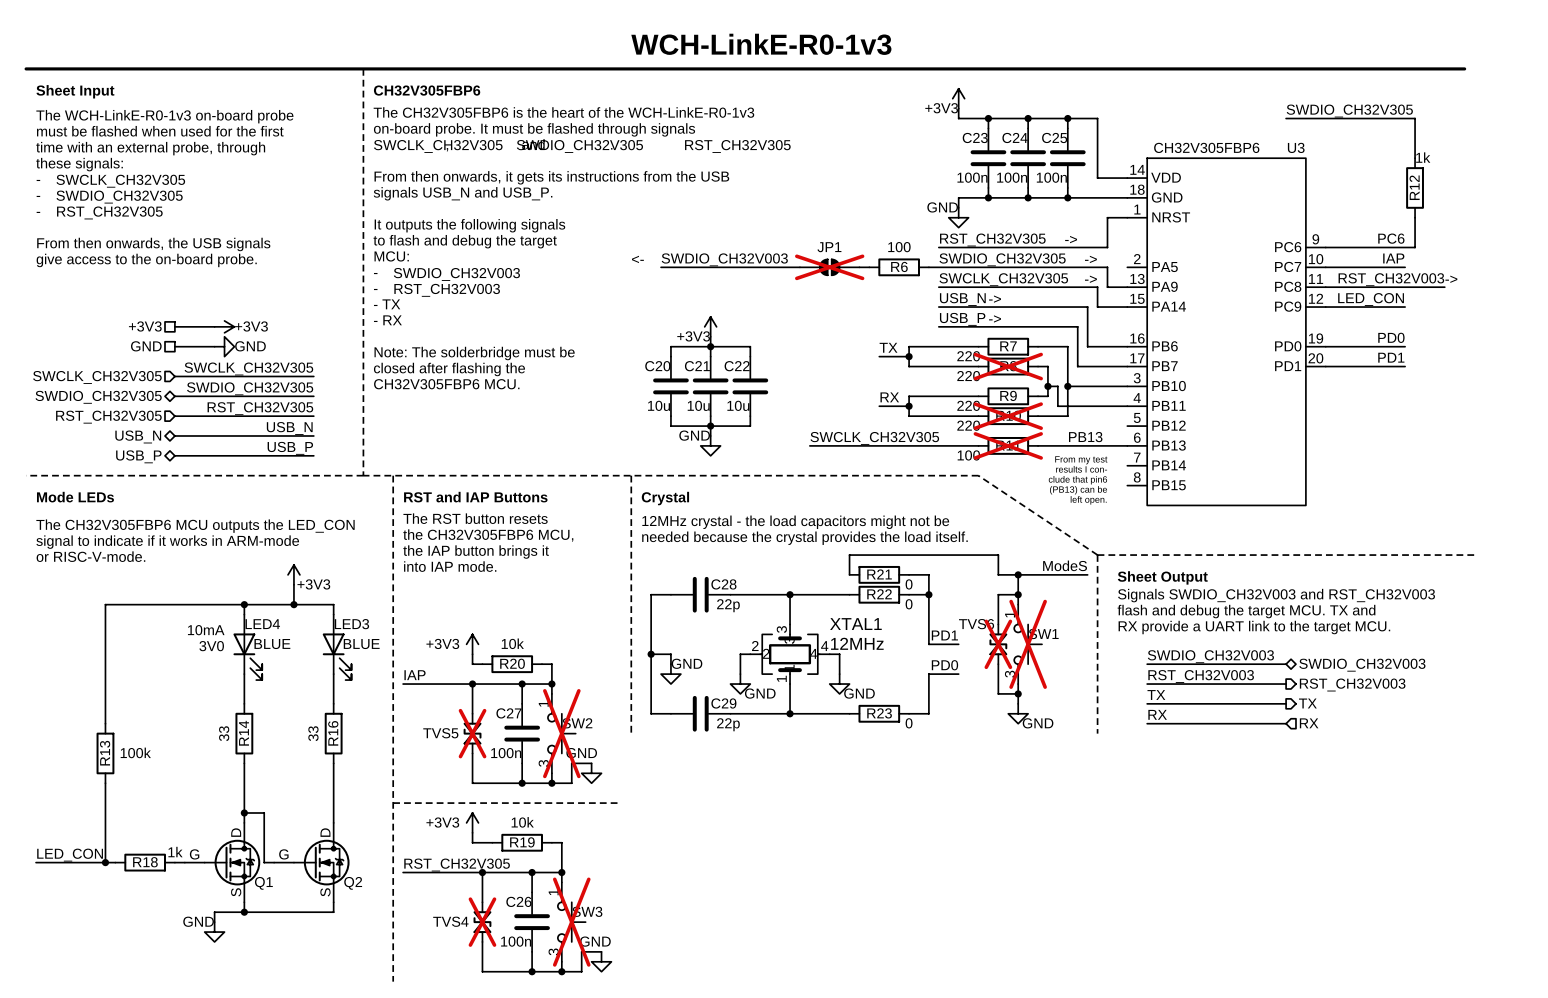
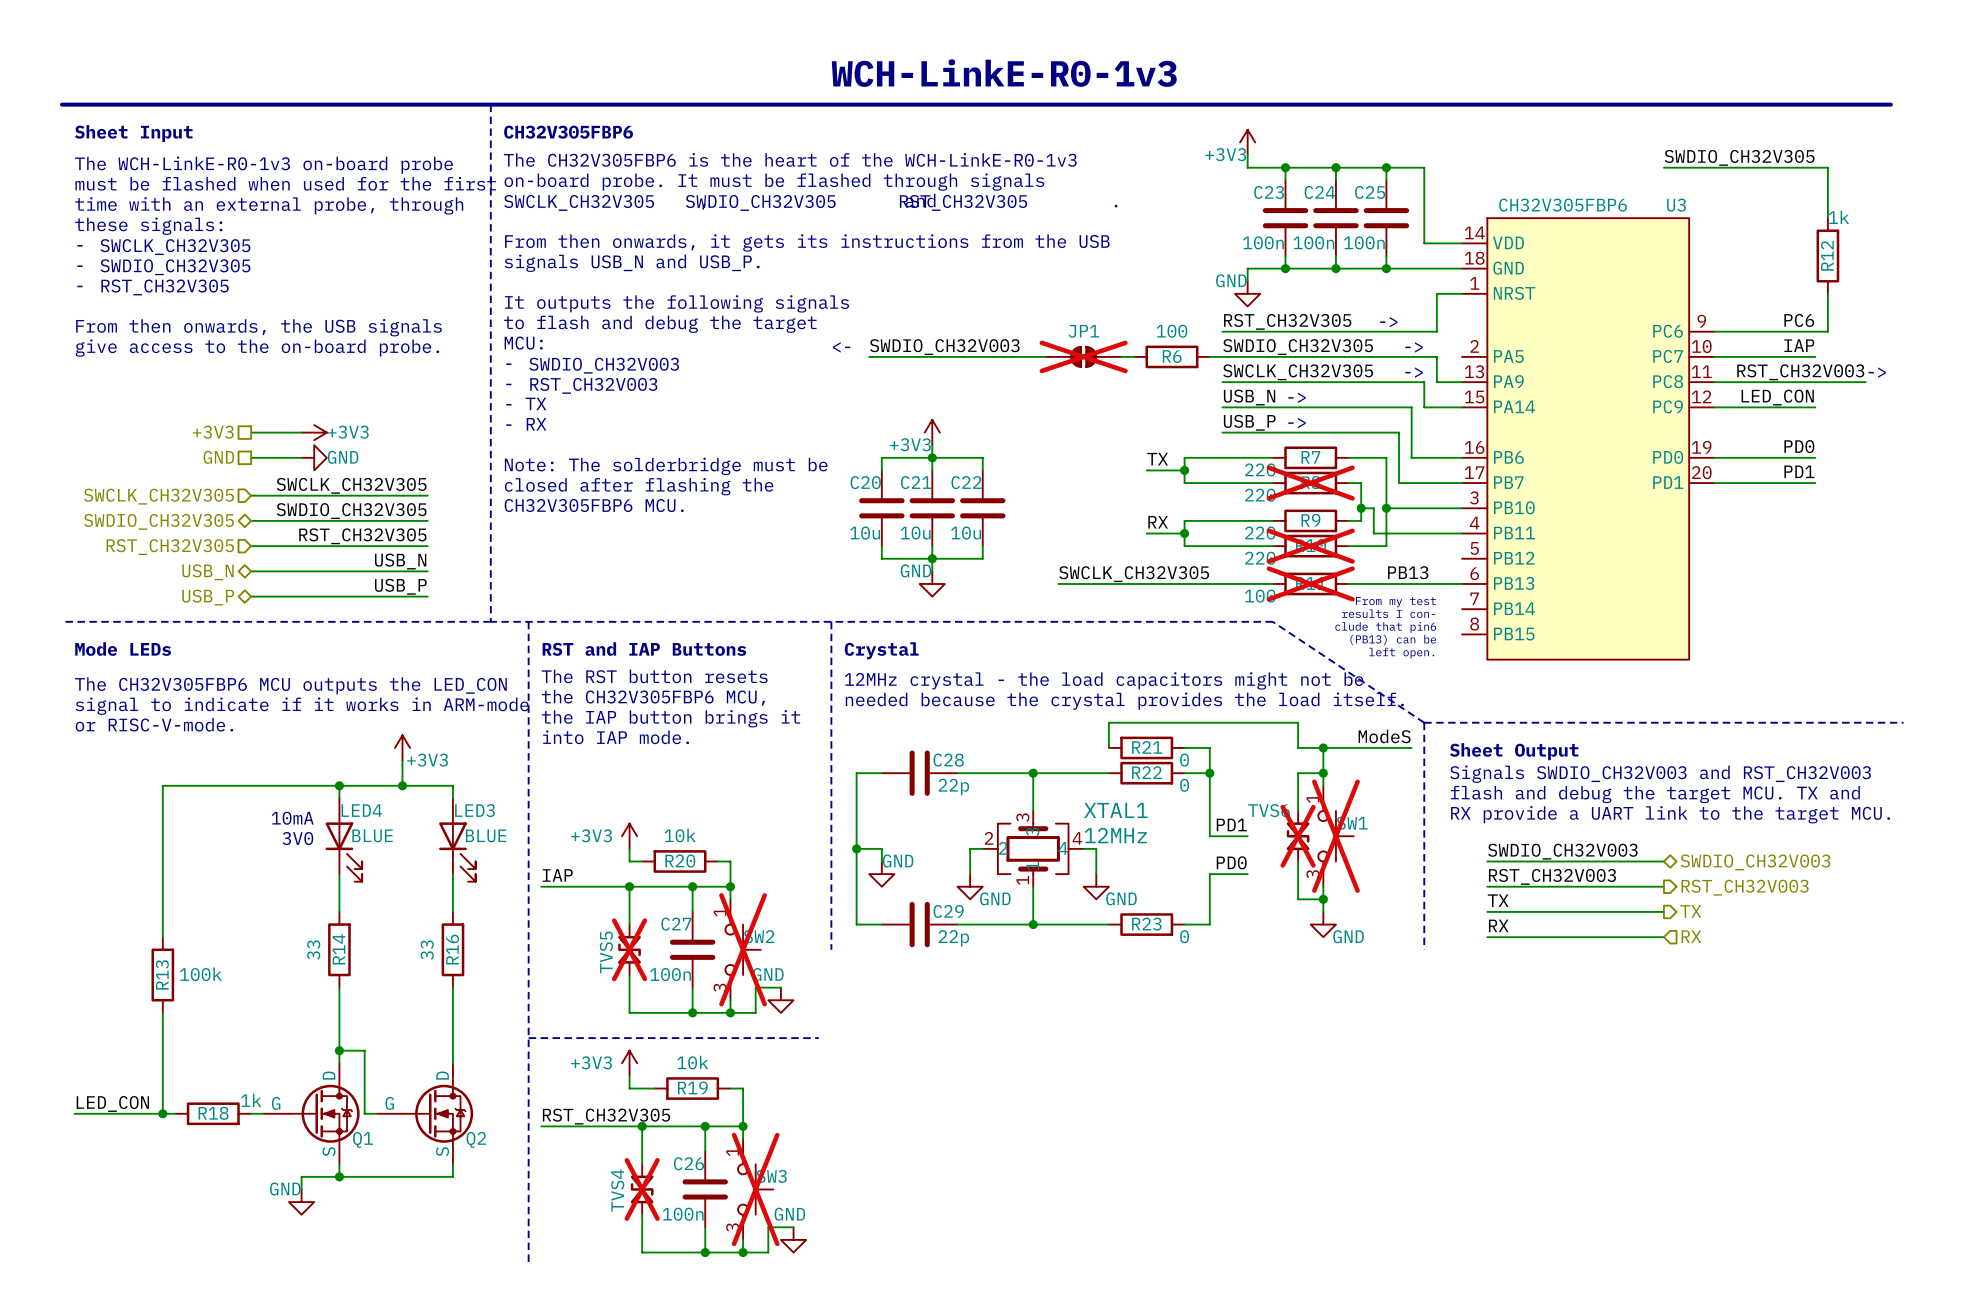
TVS5 name rotation: 0° (440, 733) -> 90° counterclockwise (606, 952)
TVS4 name rotation: 0° (450, 921) -> 90° counterclockwise (617, 1190)

